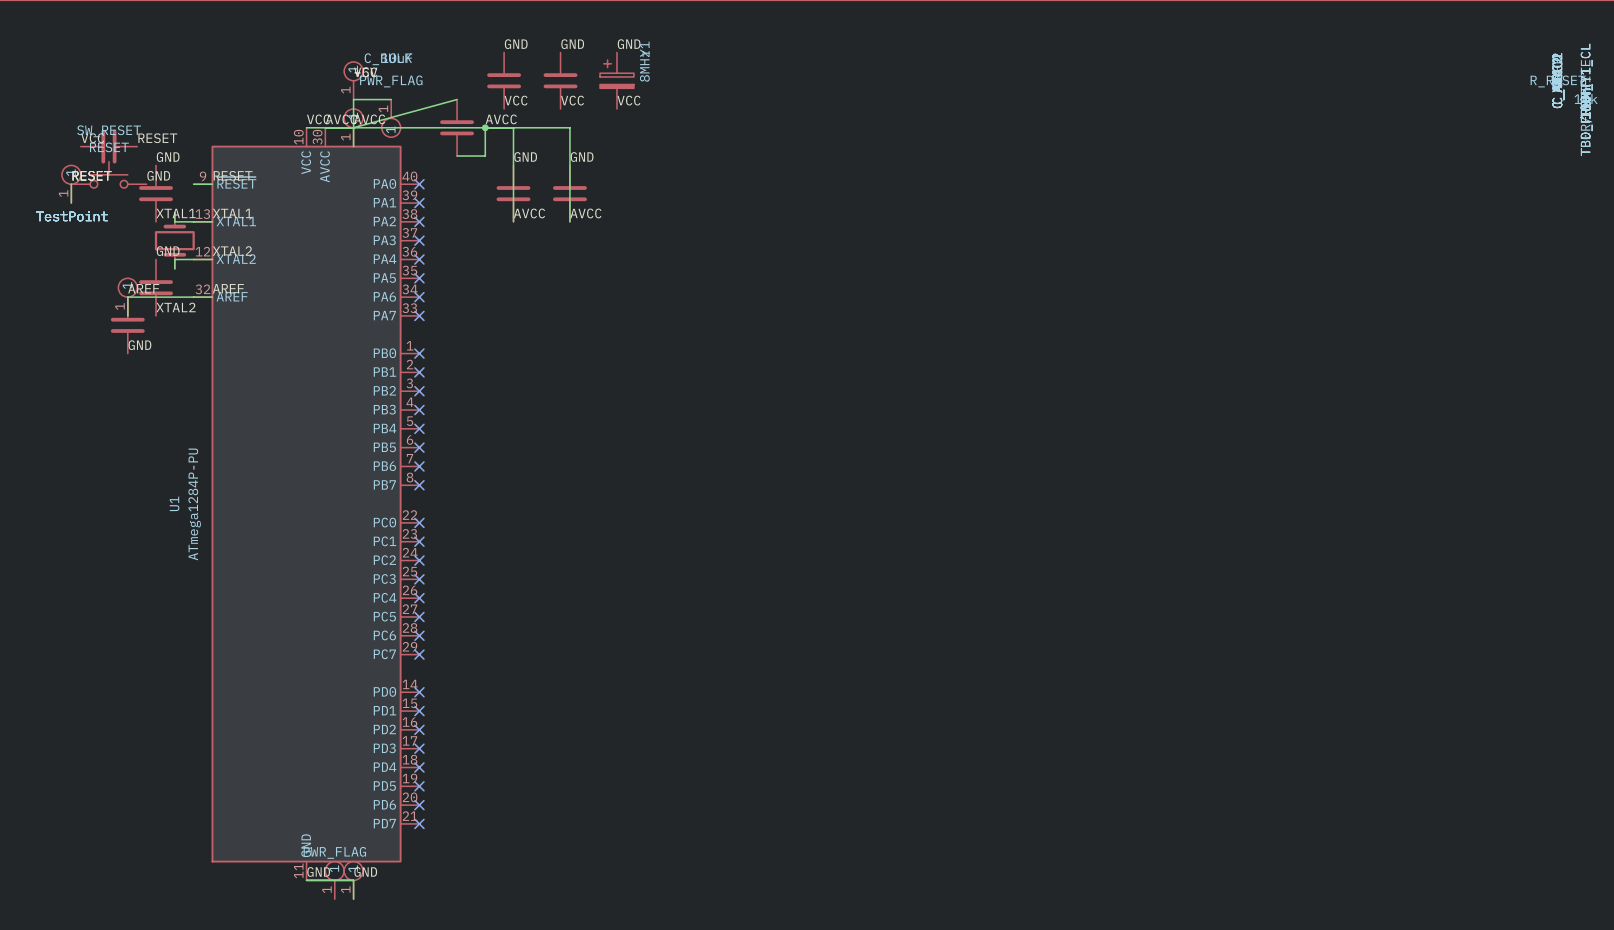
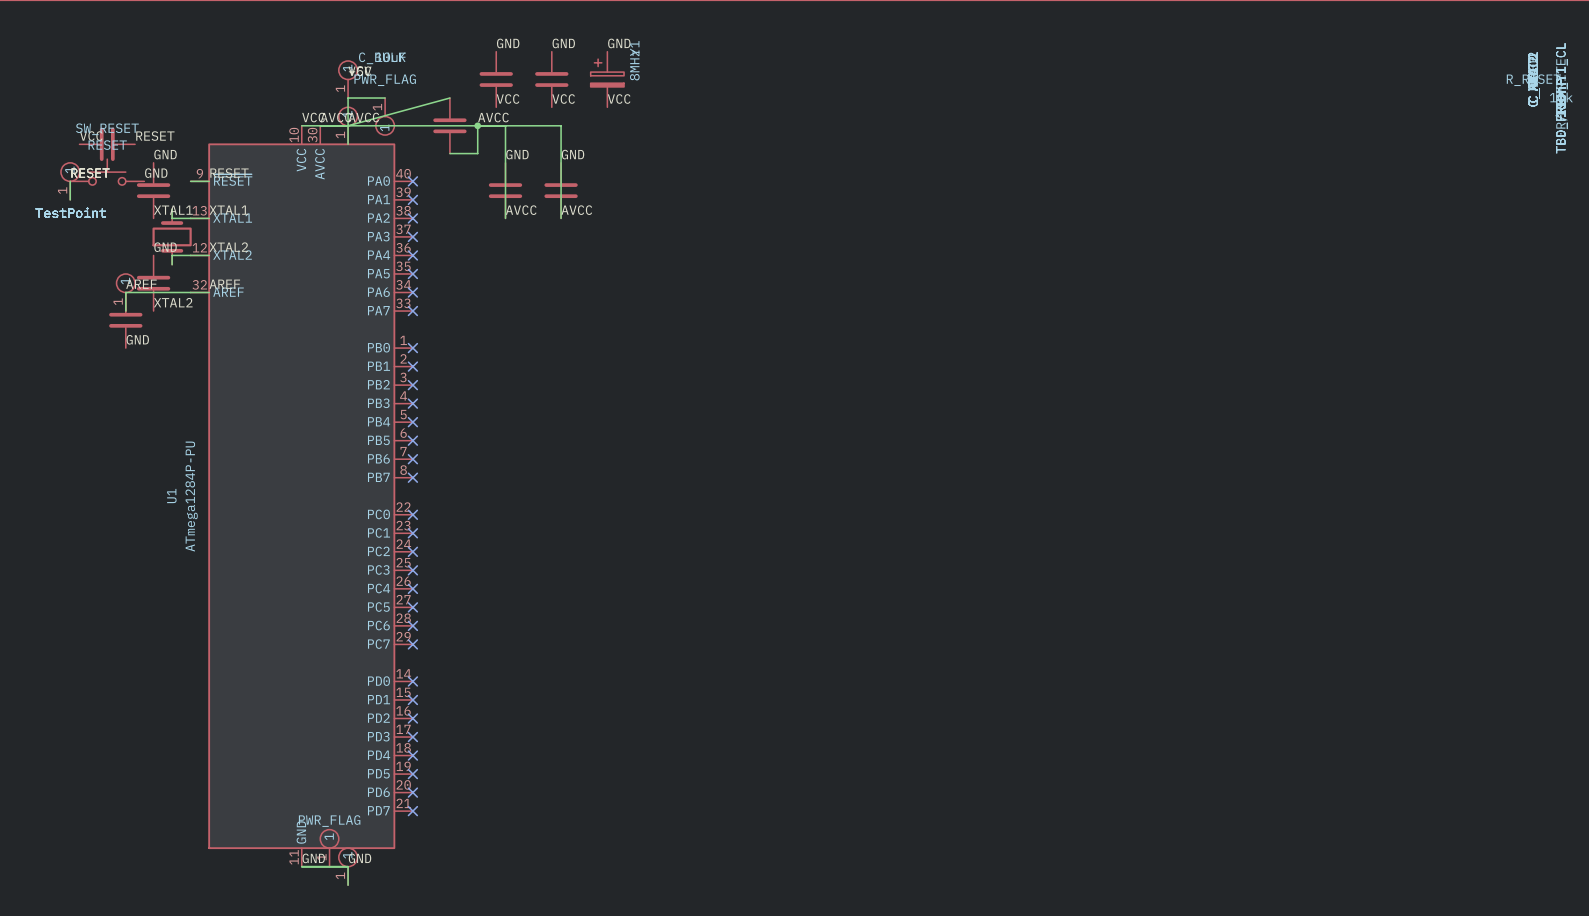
power symbol position: PWR_FLAG (334, 880) -> PWR_FLAG (329, 848)

